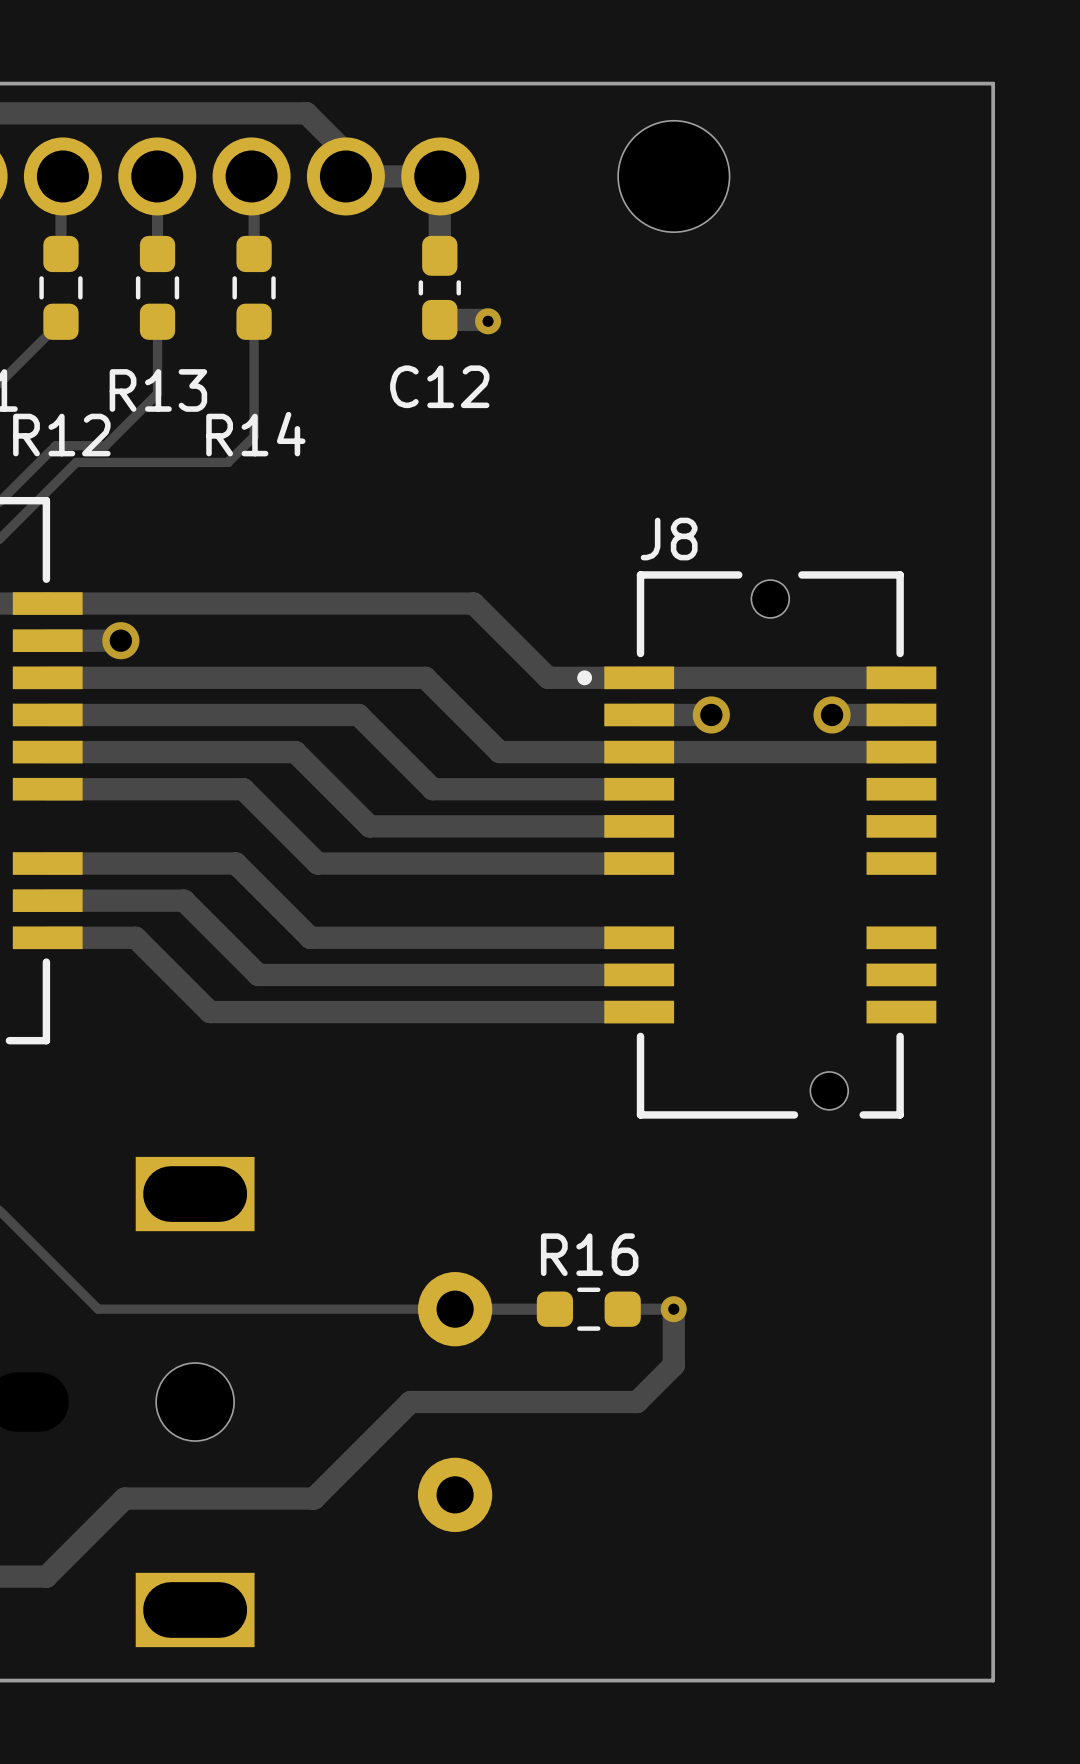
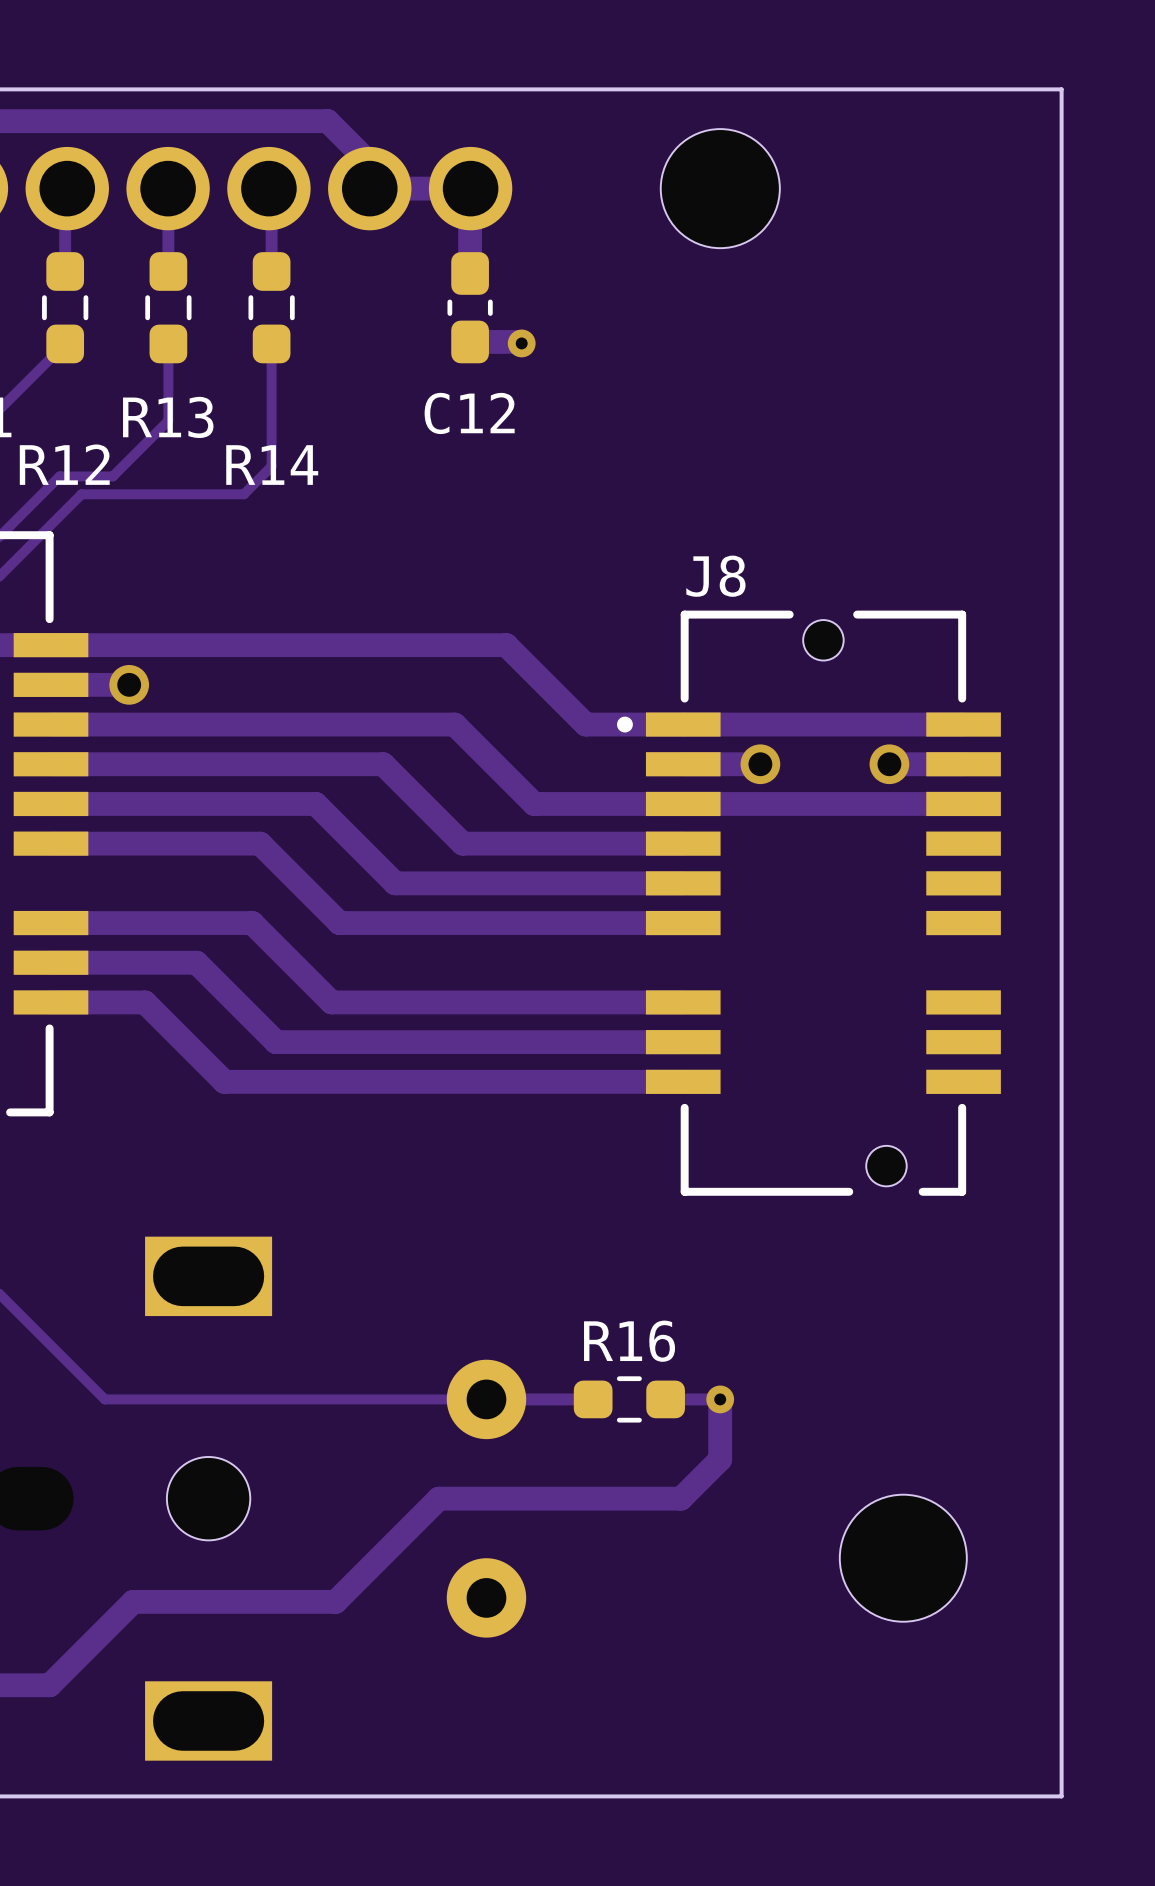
part: none -> (903, 1558)

